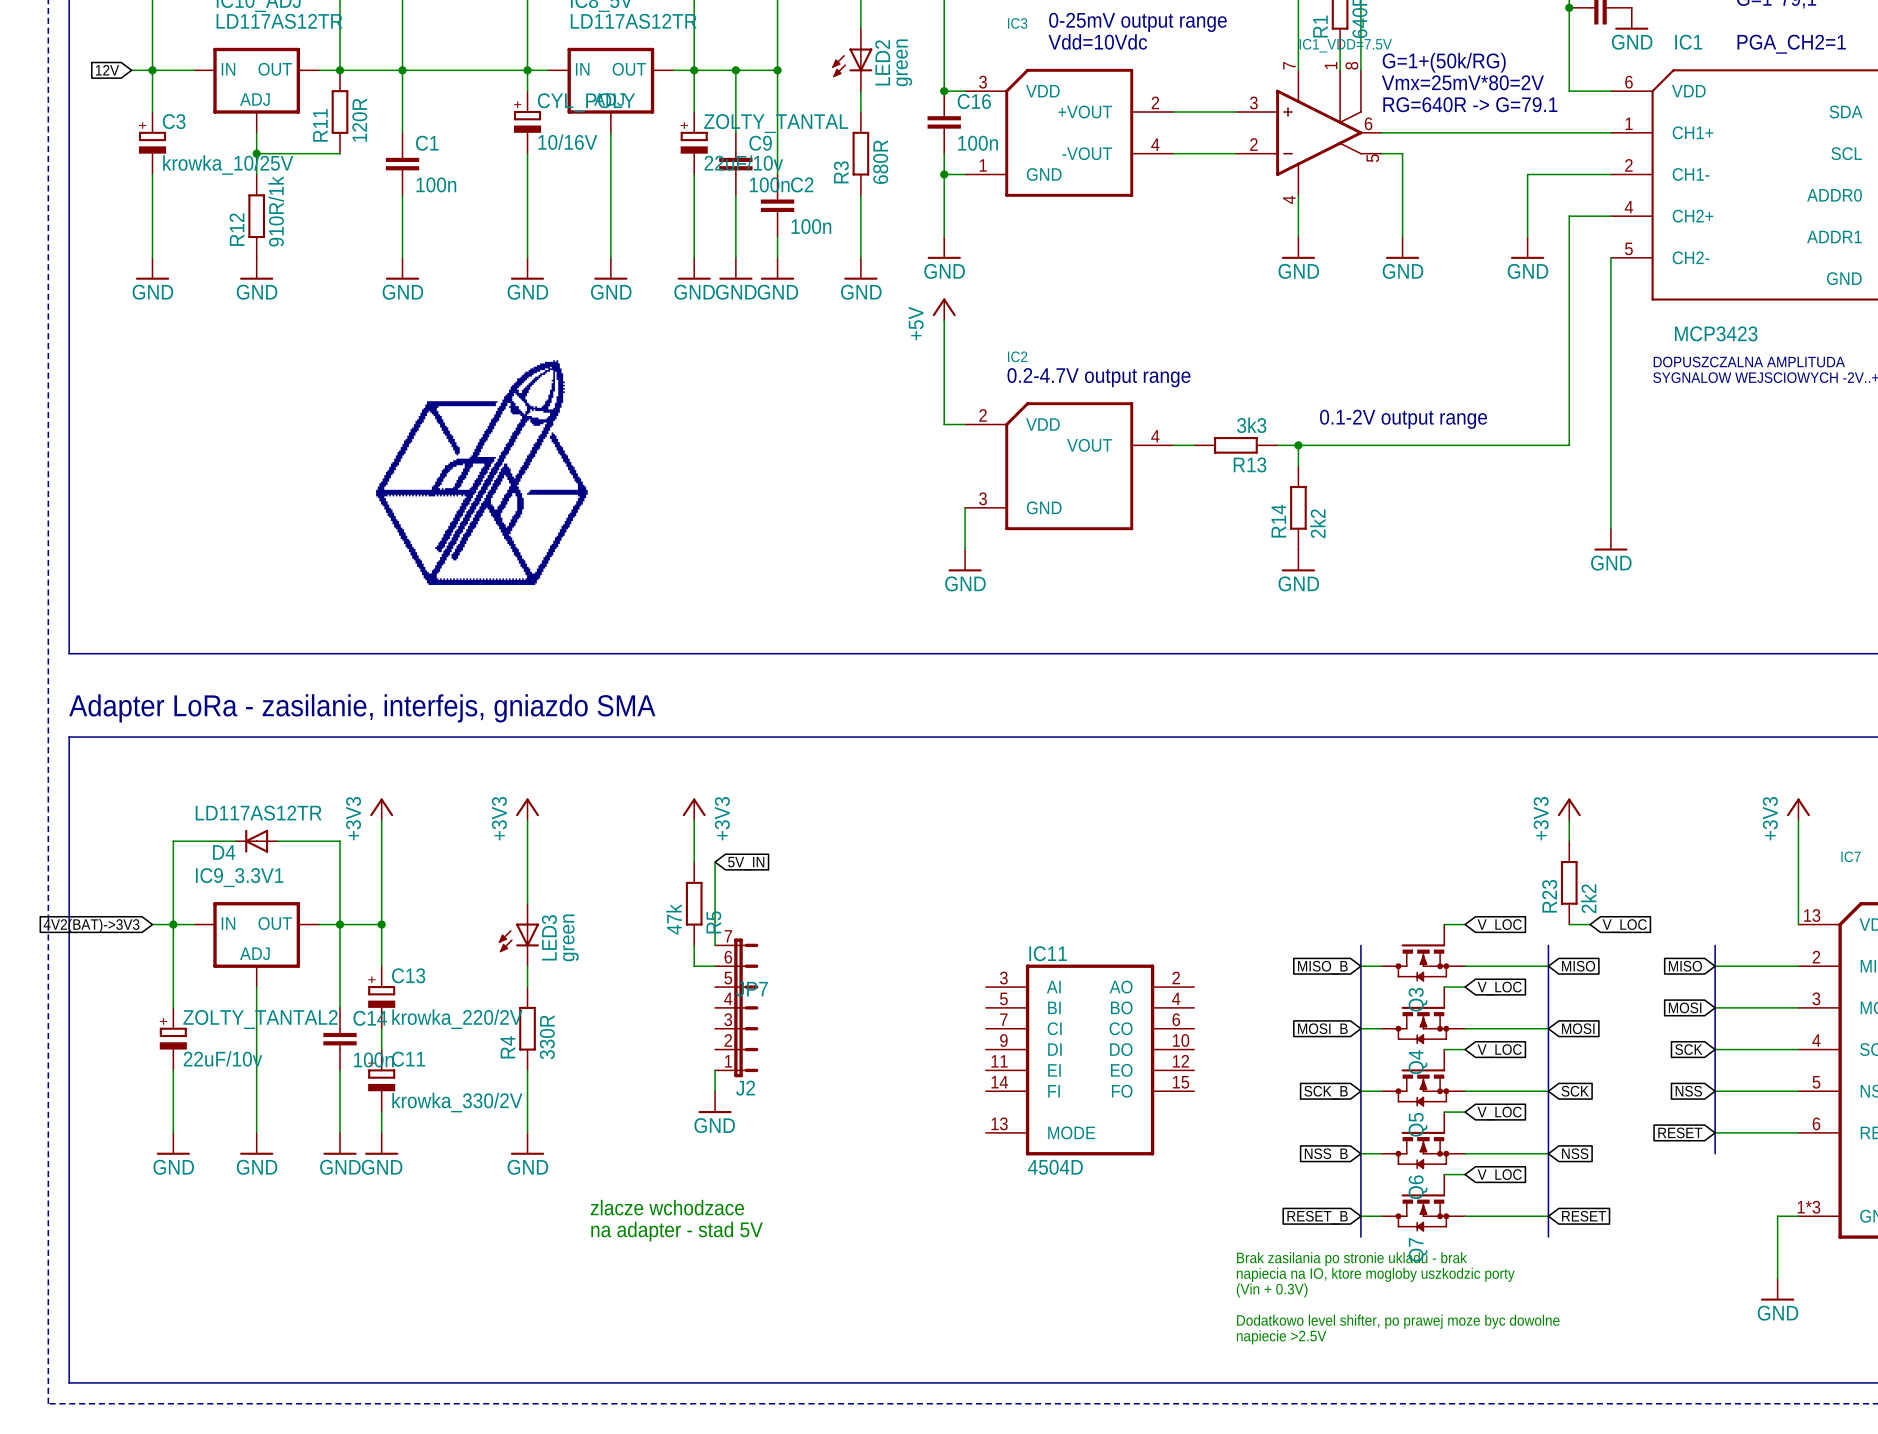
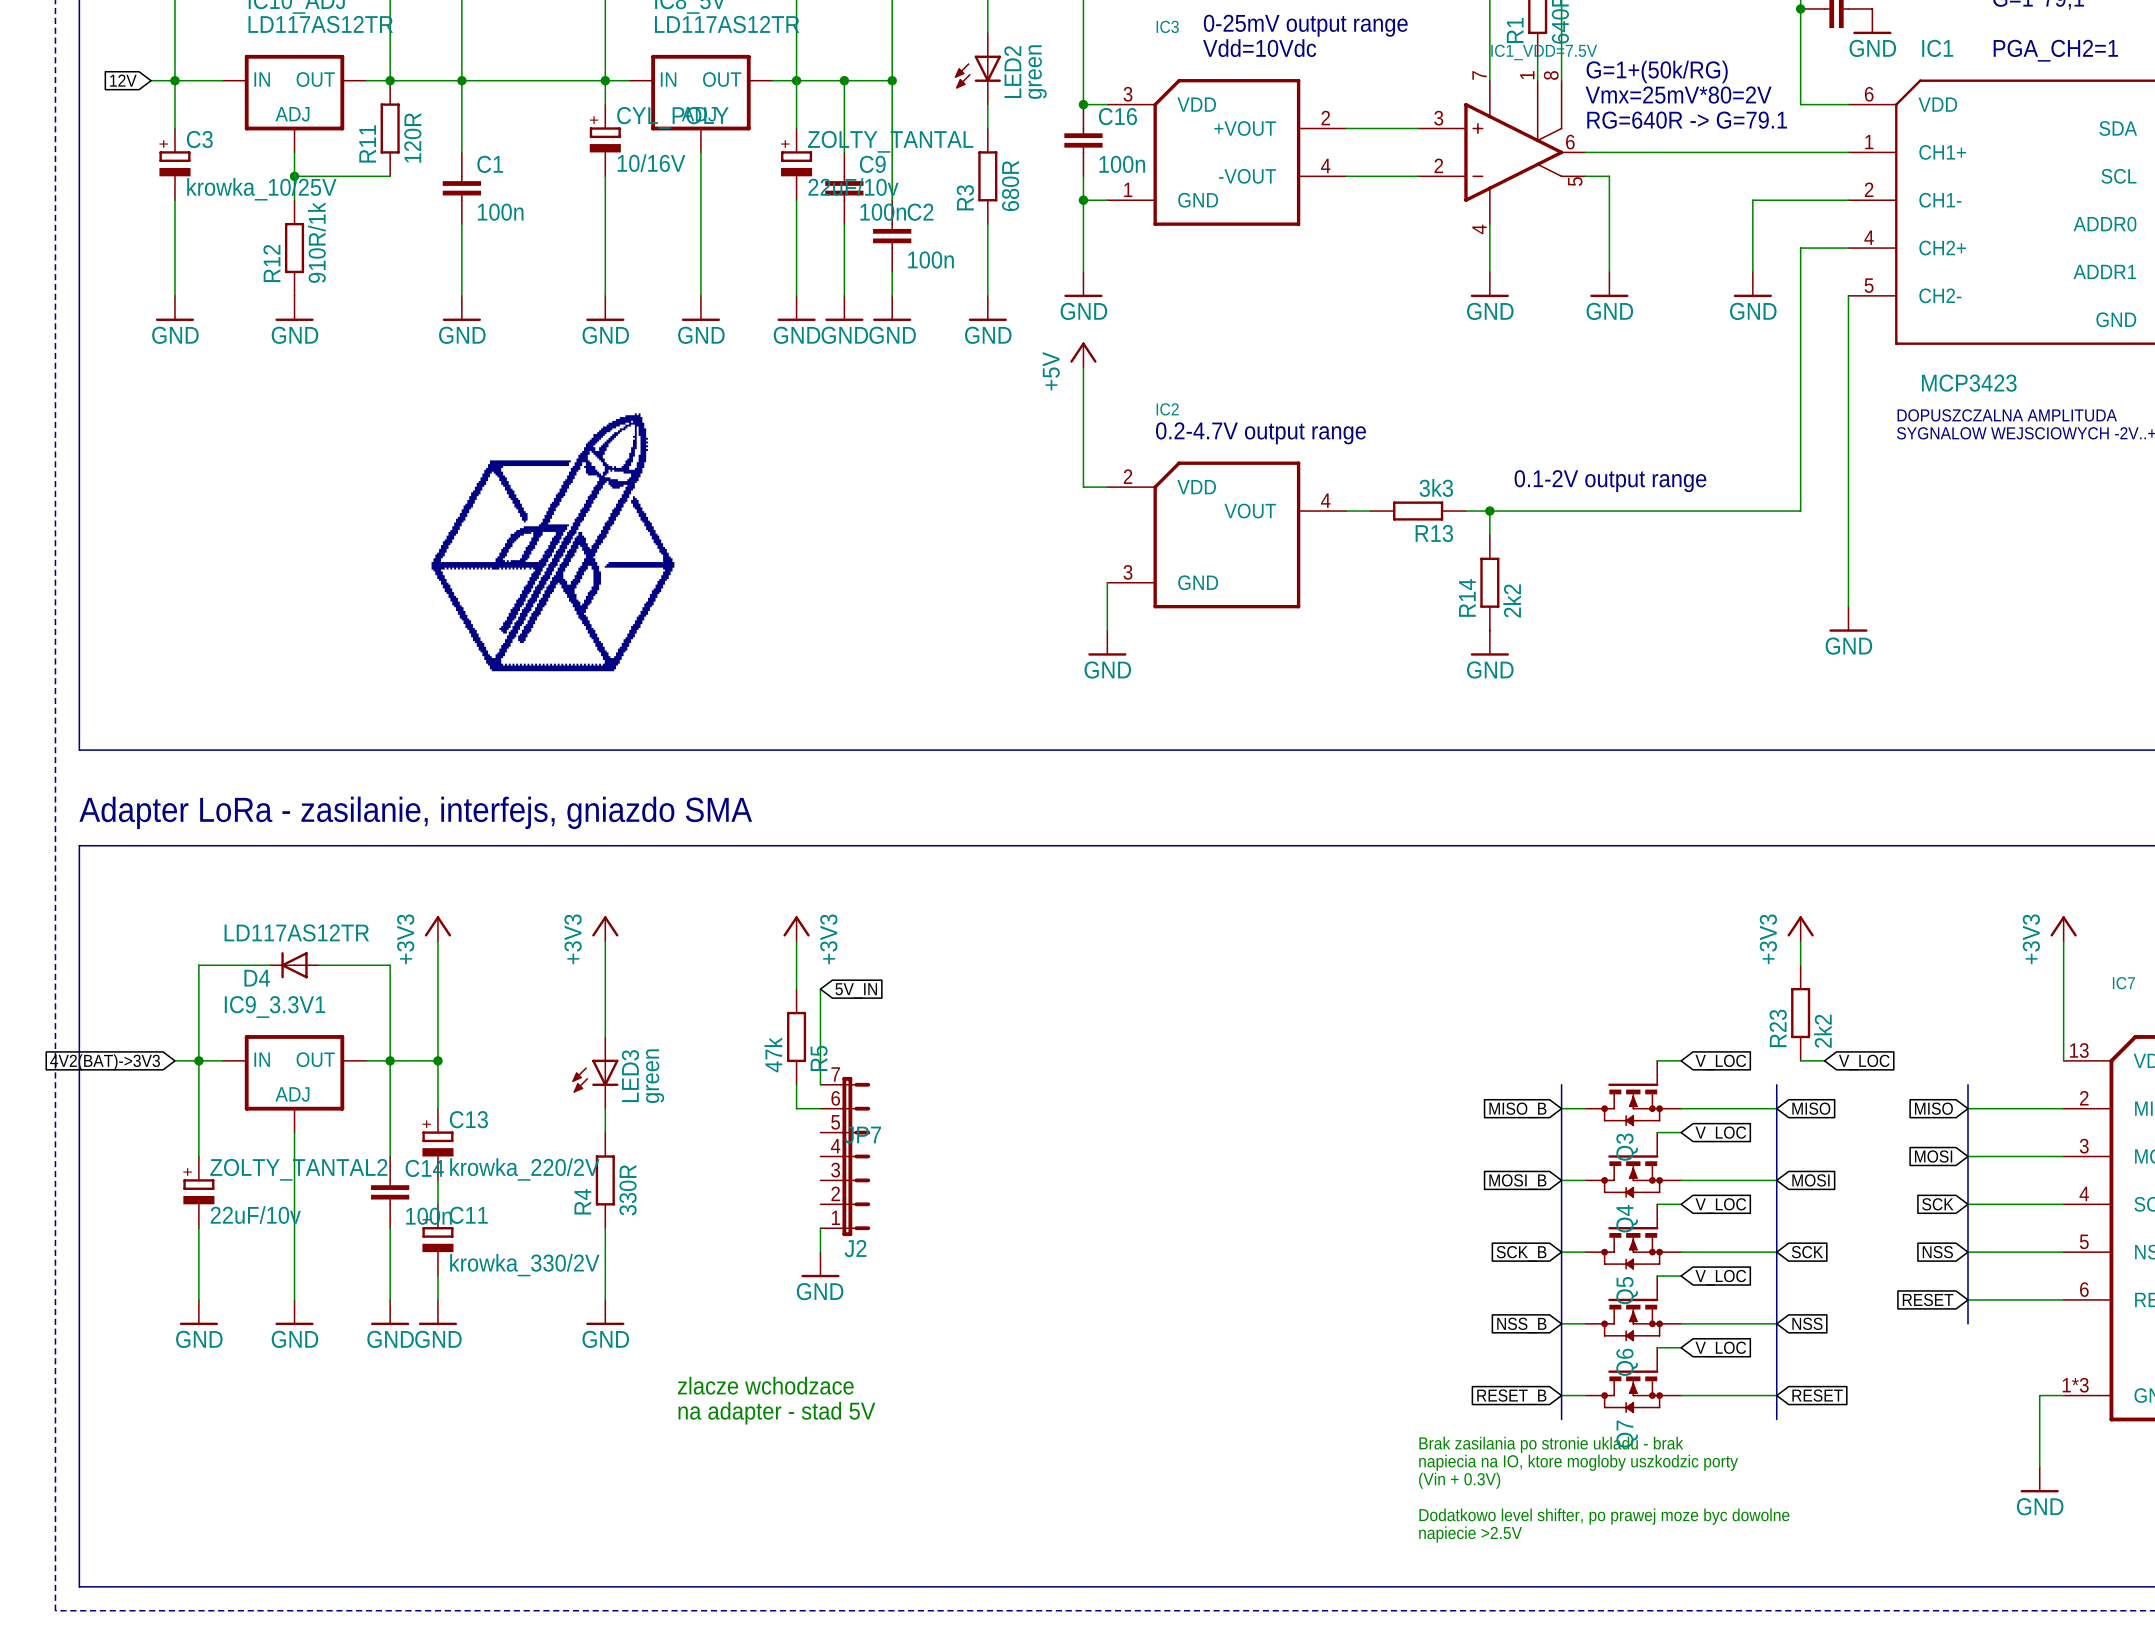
IC11: 4504D (1090, 1059) -> none

